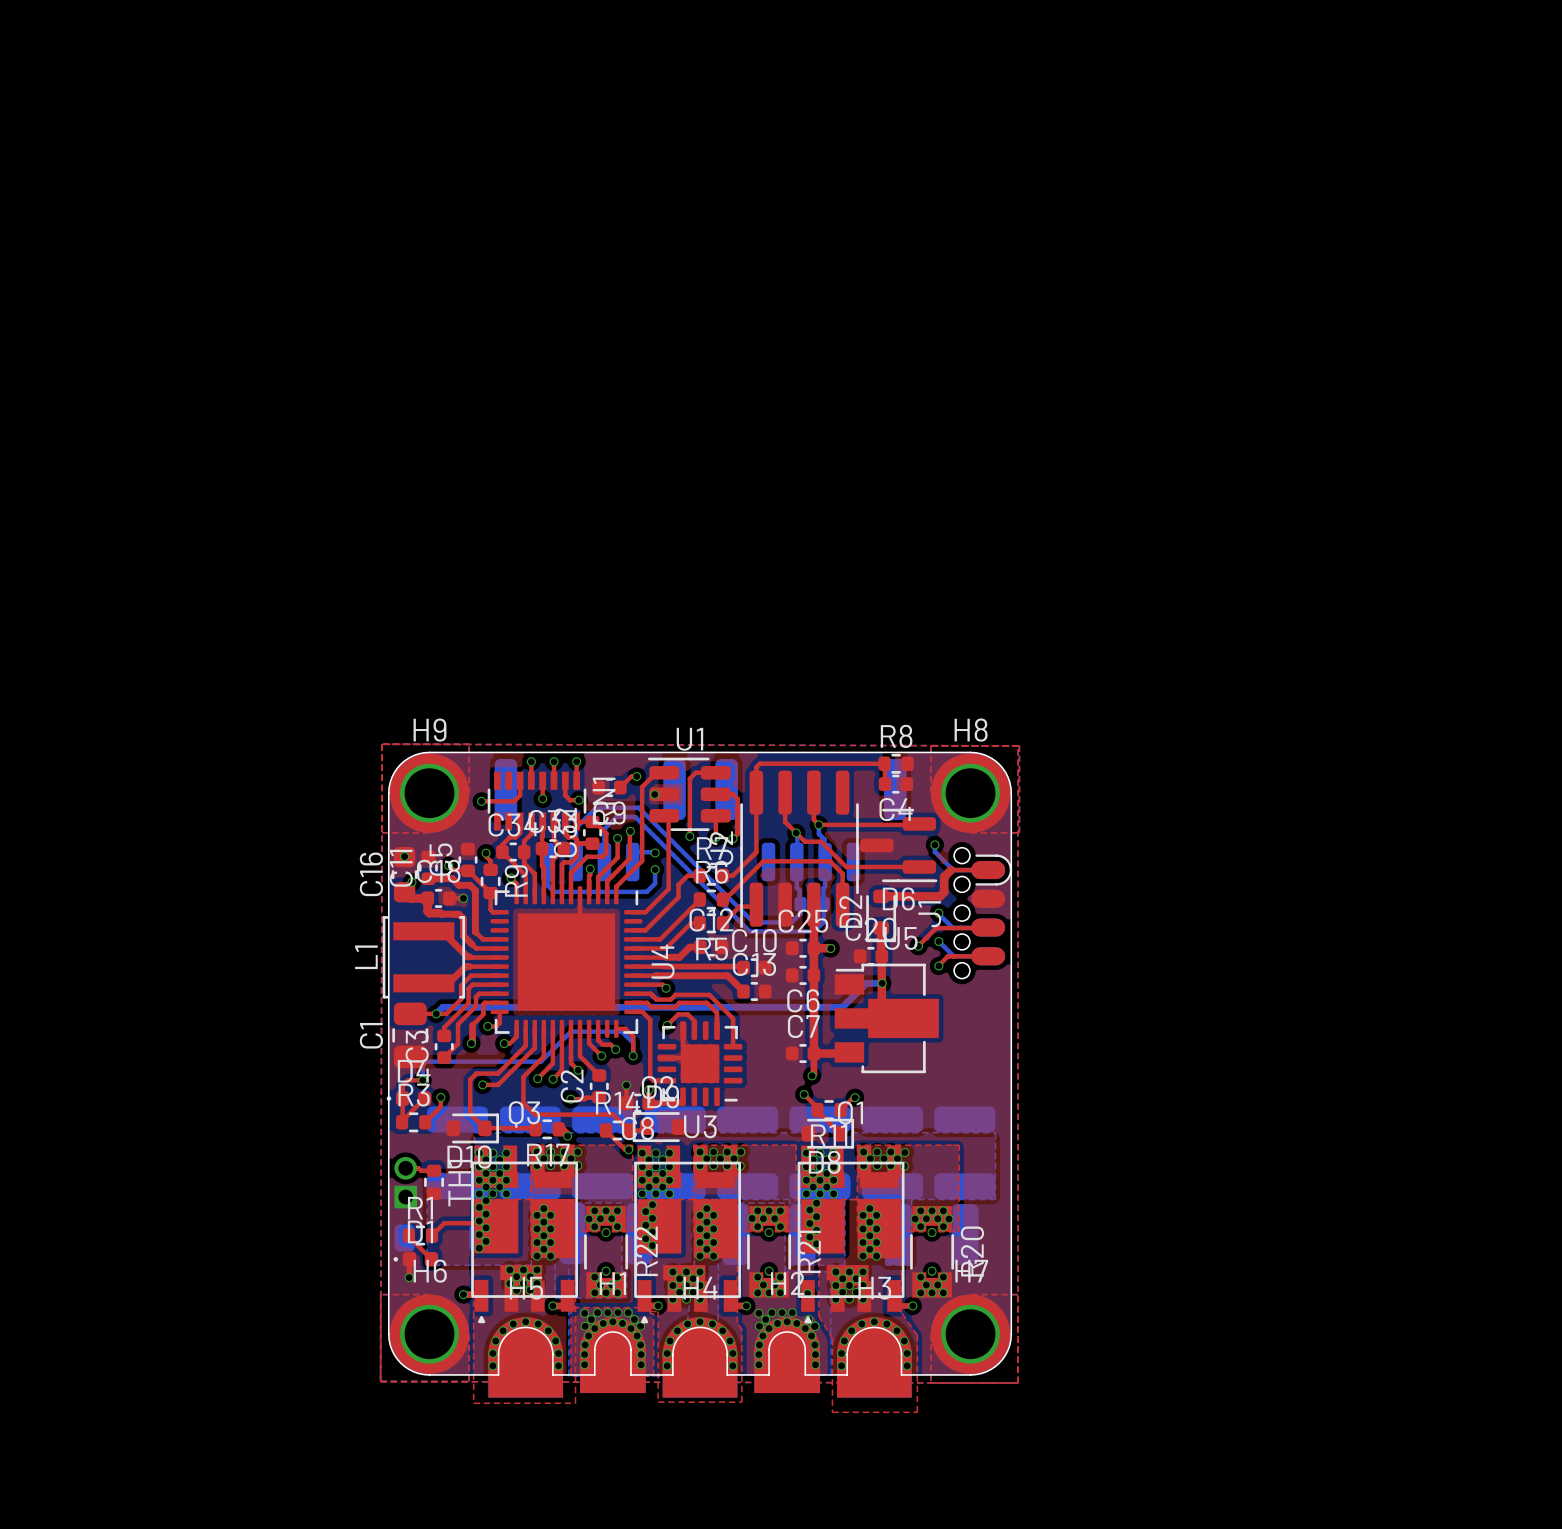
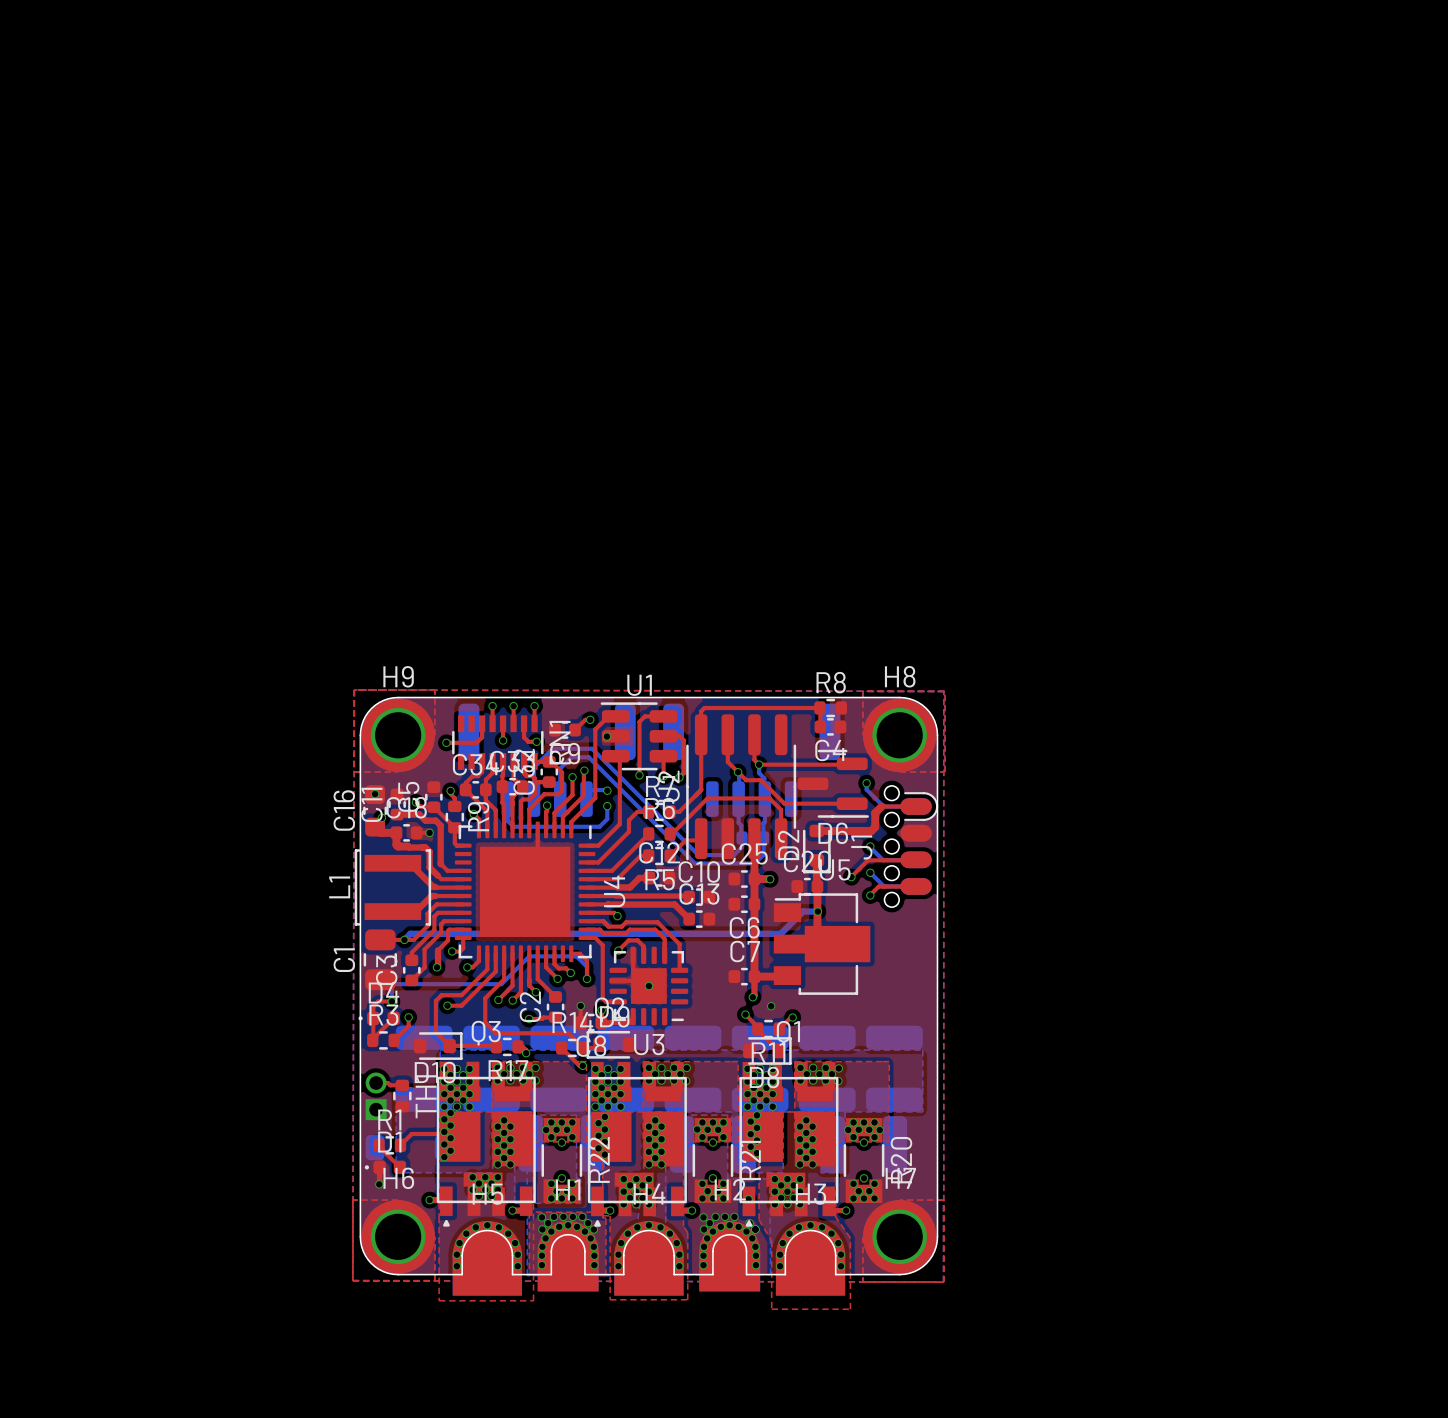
via: none -> (648, 986)
via: none -> (771, 1006)

